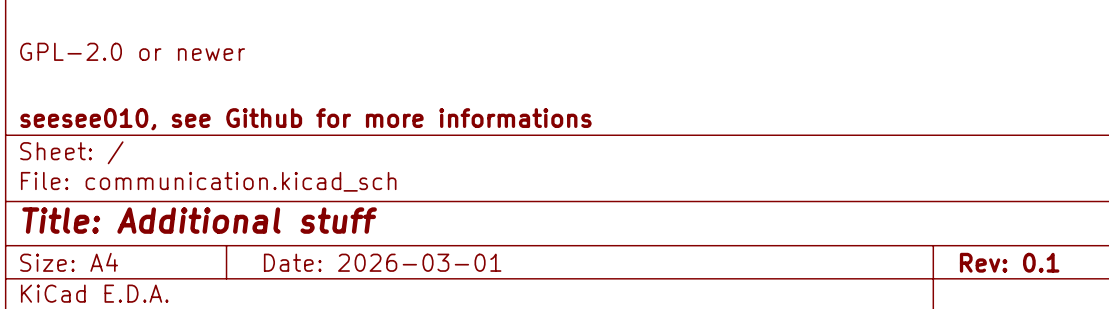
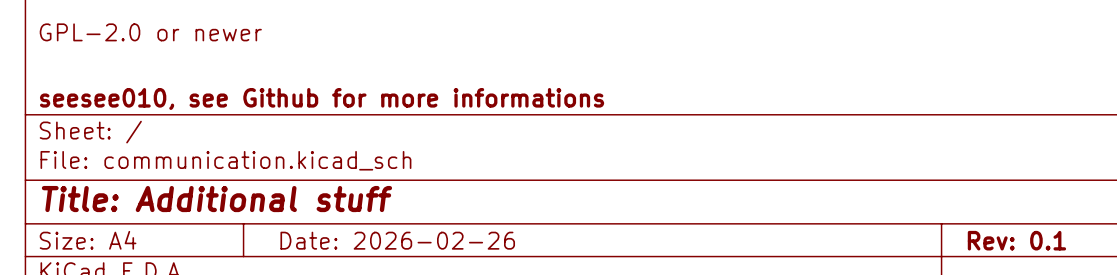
title block: Date: 2026-03-01 (382, 262) -> Date: 2026-02-26 (397, 240)

